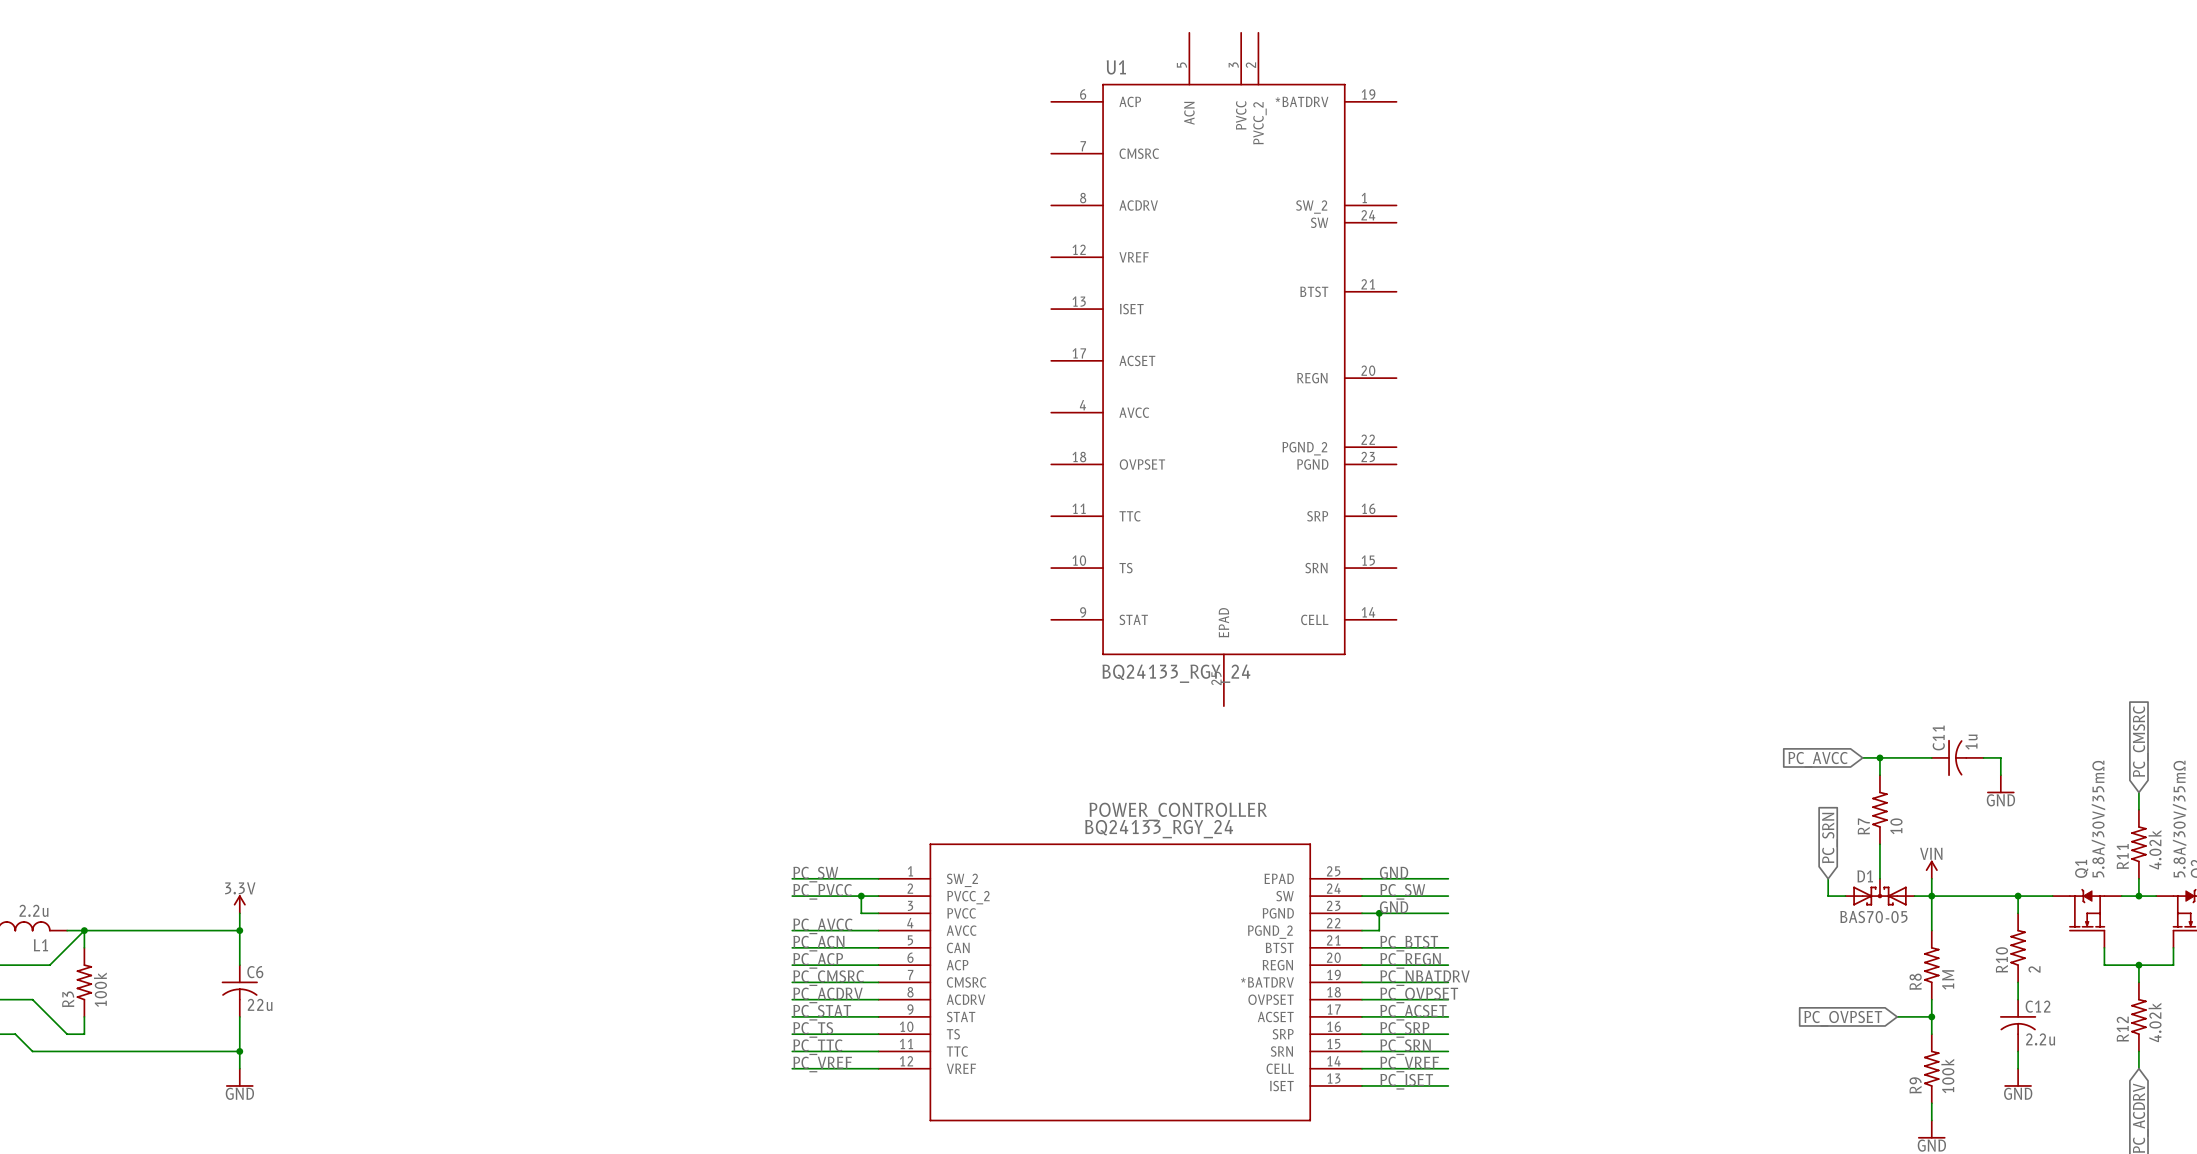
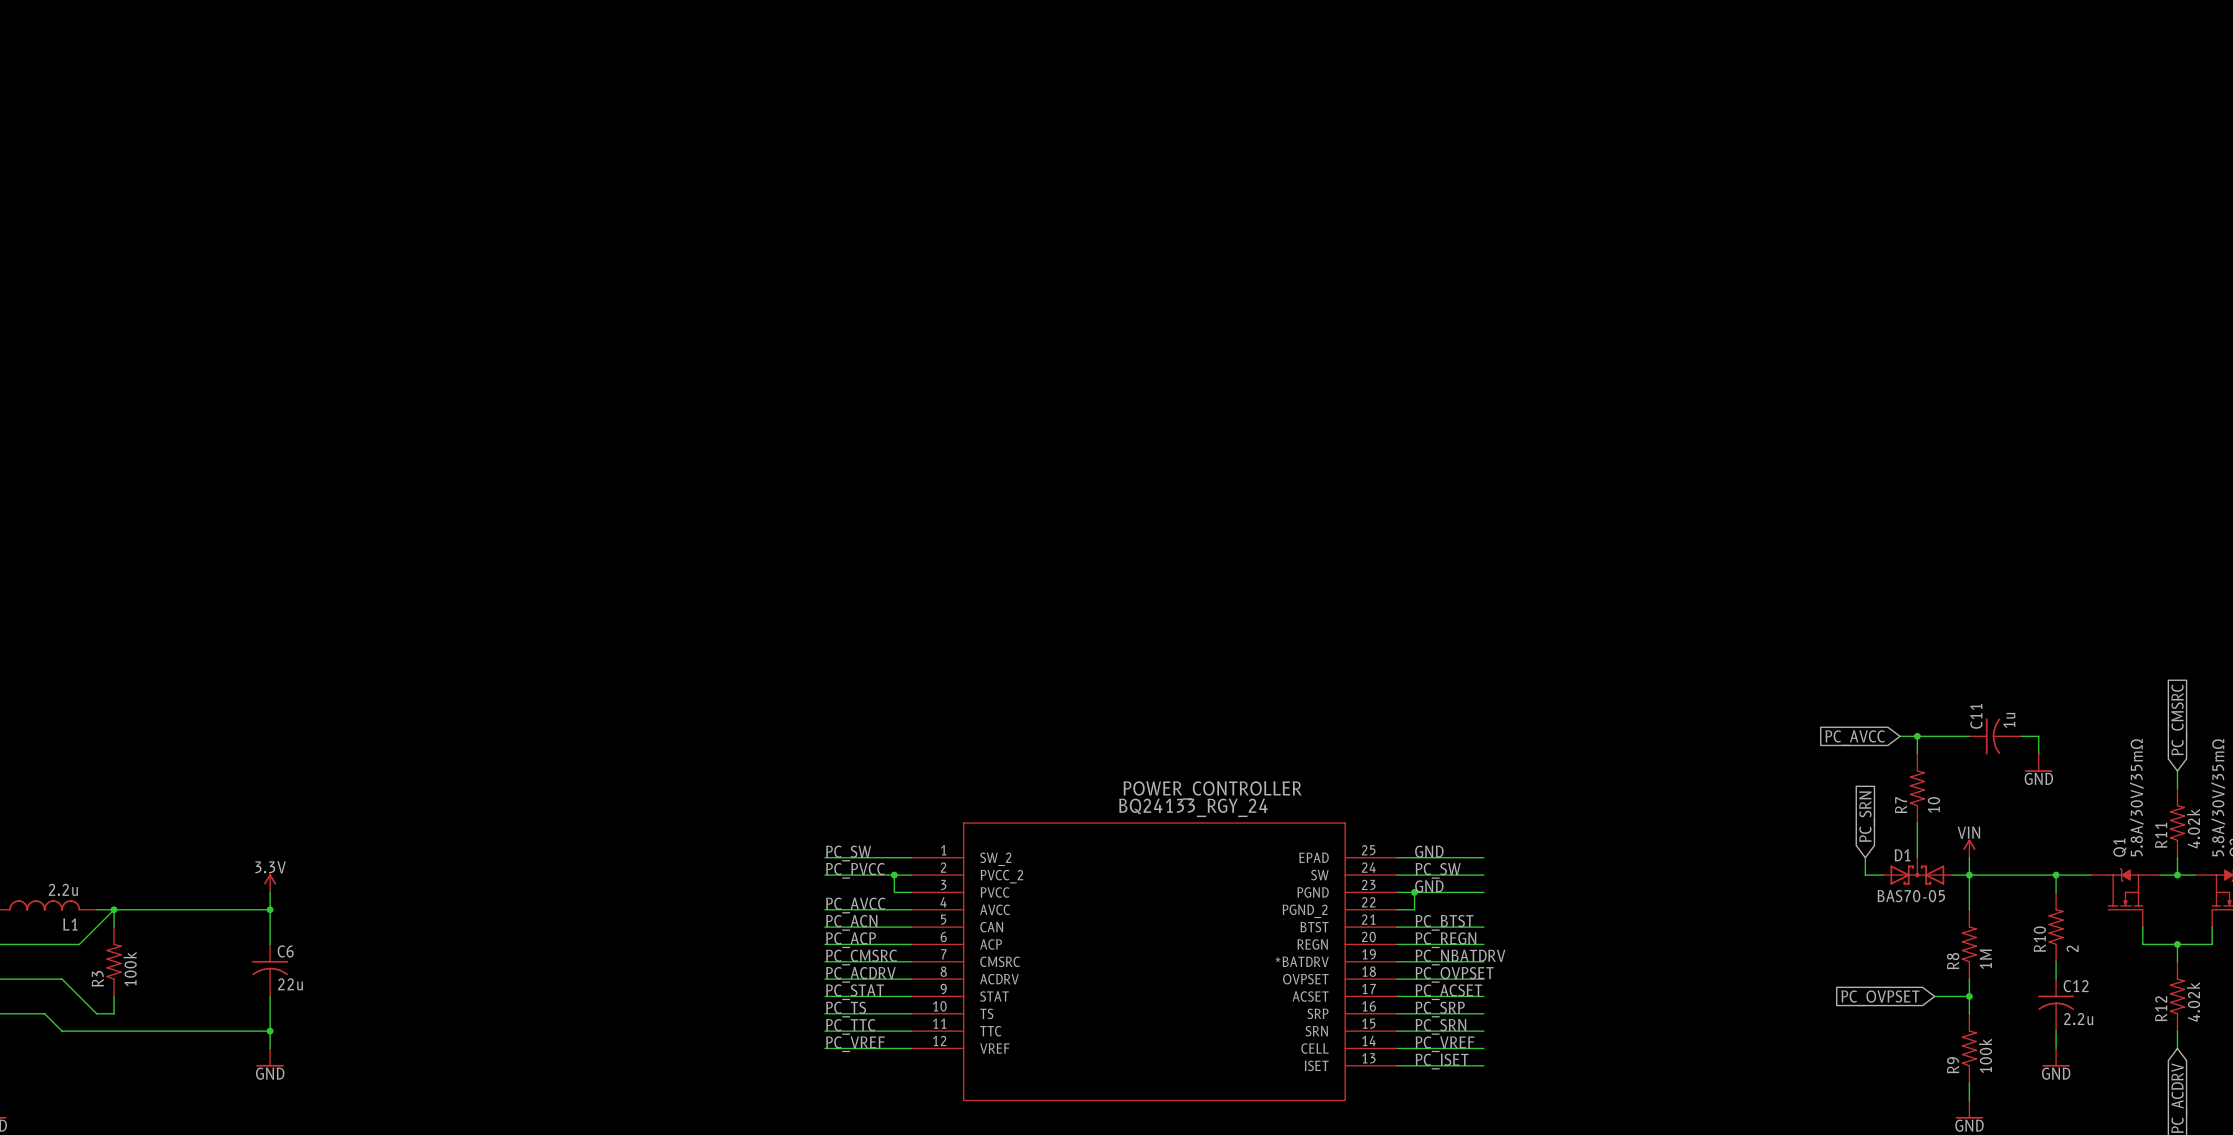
U1: BQ24133_RGY_24 (1223, 369) -> none

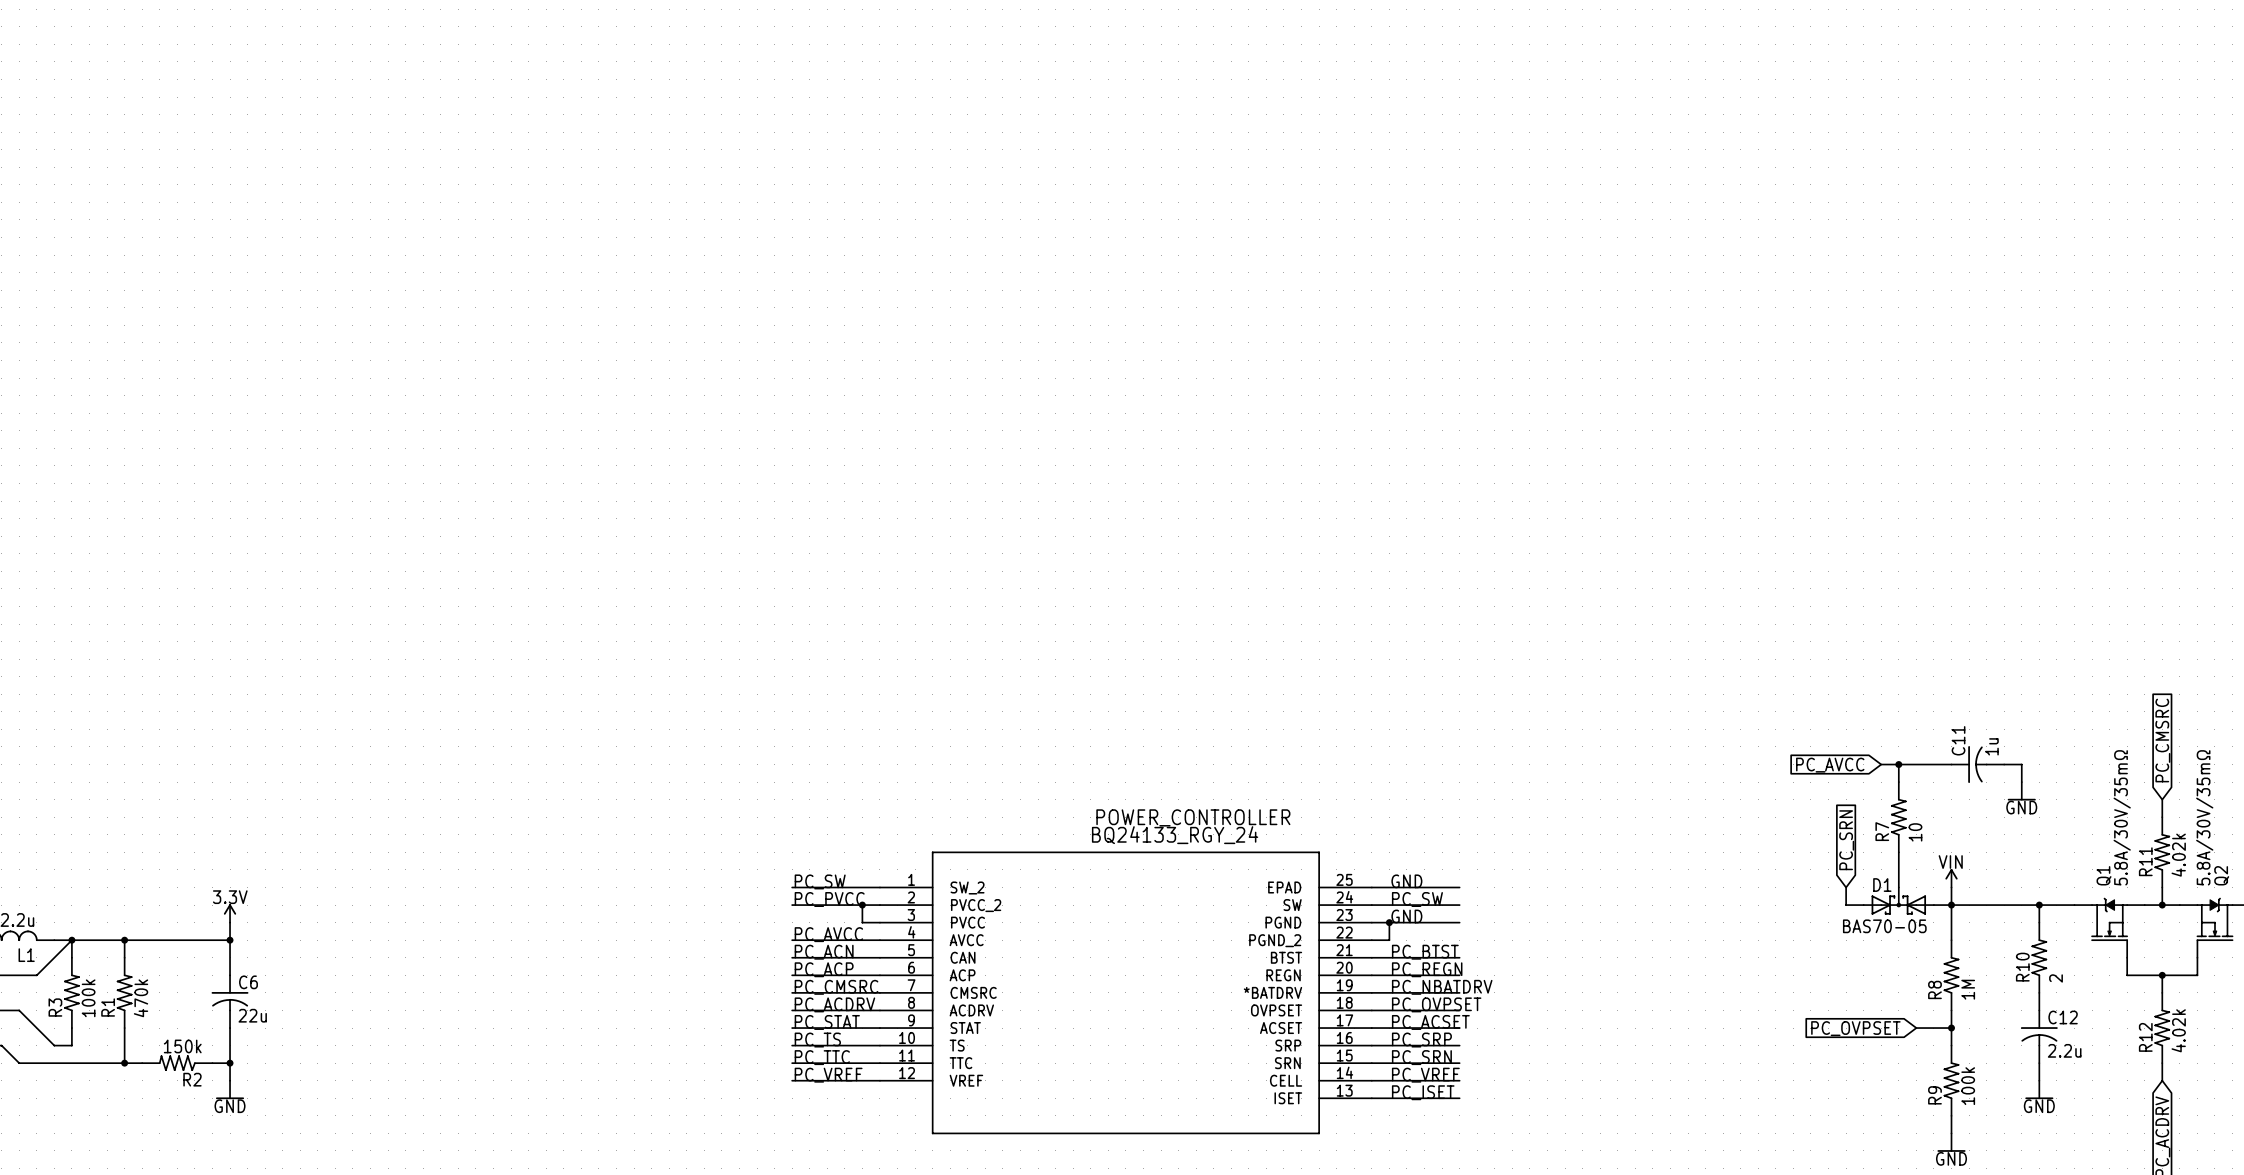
wire: none -> (124, 940) (124, 957)
junction: none -> (124, 940)
R1: none -> 470k (124, 992)
wire: none -> (124, 1028) (124, 1063)
junction: none -> (124, 1063)
R2: none -> 150k (177, 1063)

